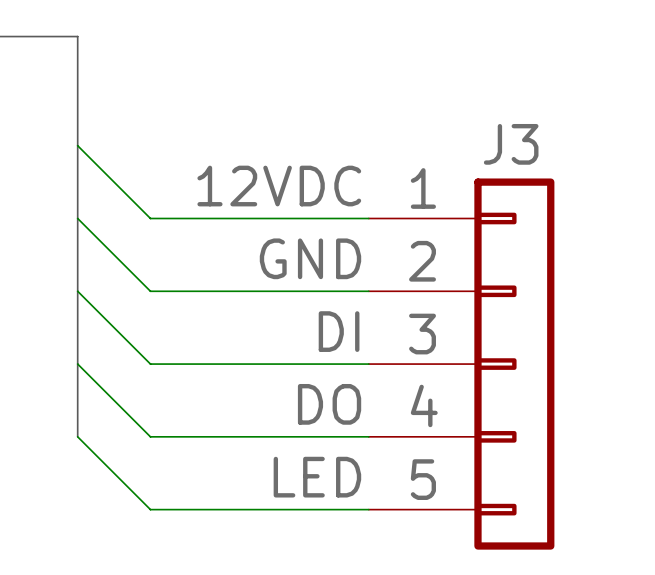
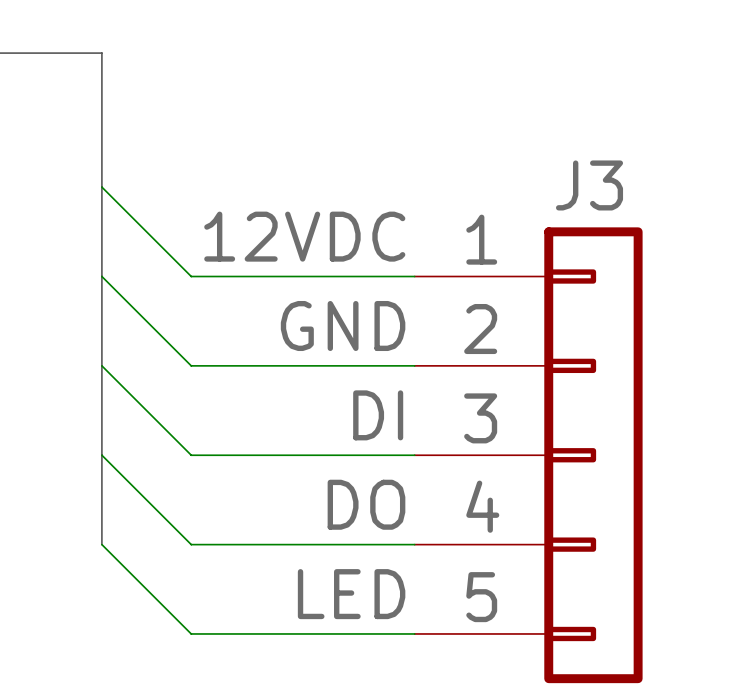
bus: (77, 36) (77, 436) -> (57, 53) (101, 53) (101, 544)
wire: (77, 145) (150, 218) (186, 218) -> (101, 187) (191, 276)
wire: (77, 218) (150, 291) (186, 291) -> (101, 276) (191, 365)
wire: (77, 291) (150, 364) (186, 364) -> (101, 365) (191, 455)
wire: (77, 364) (150, 436) (186, 436) -> (101, 455) (191, 544)
wire: (77, 436) (150, 509) (186, 509) -> (101, 544) (191, 633)

